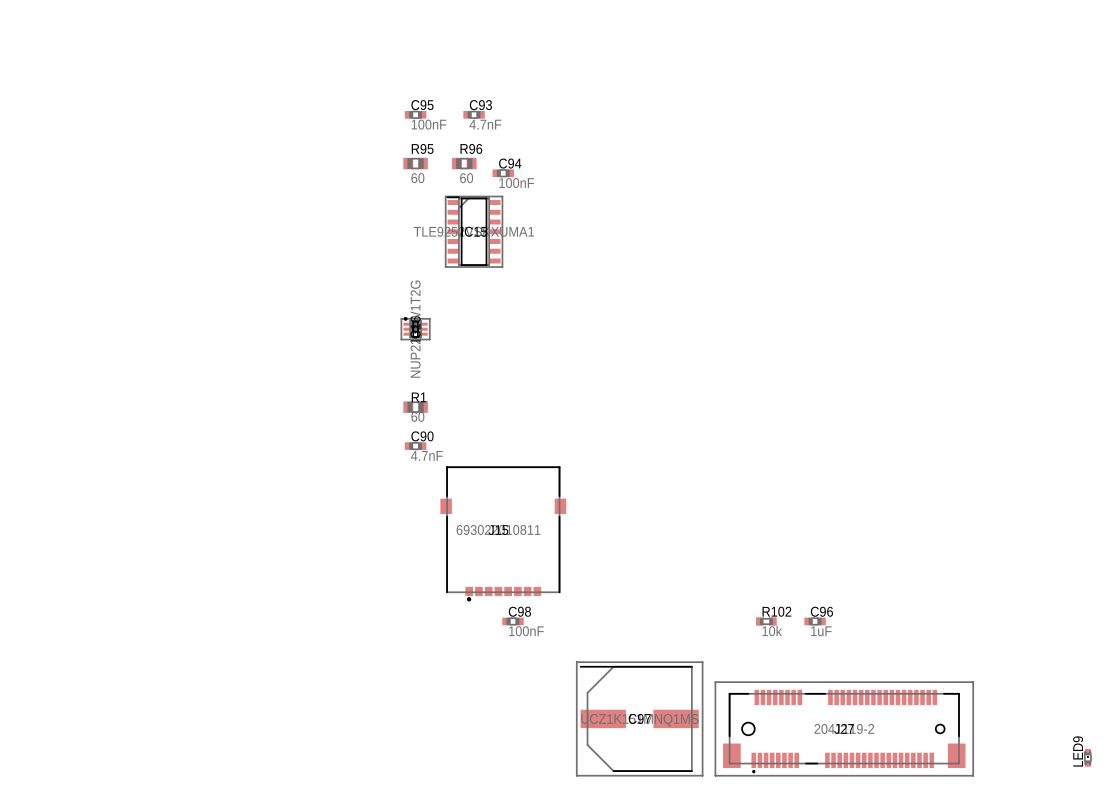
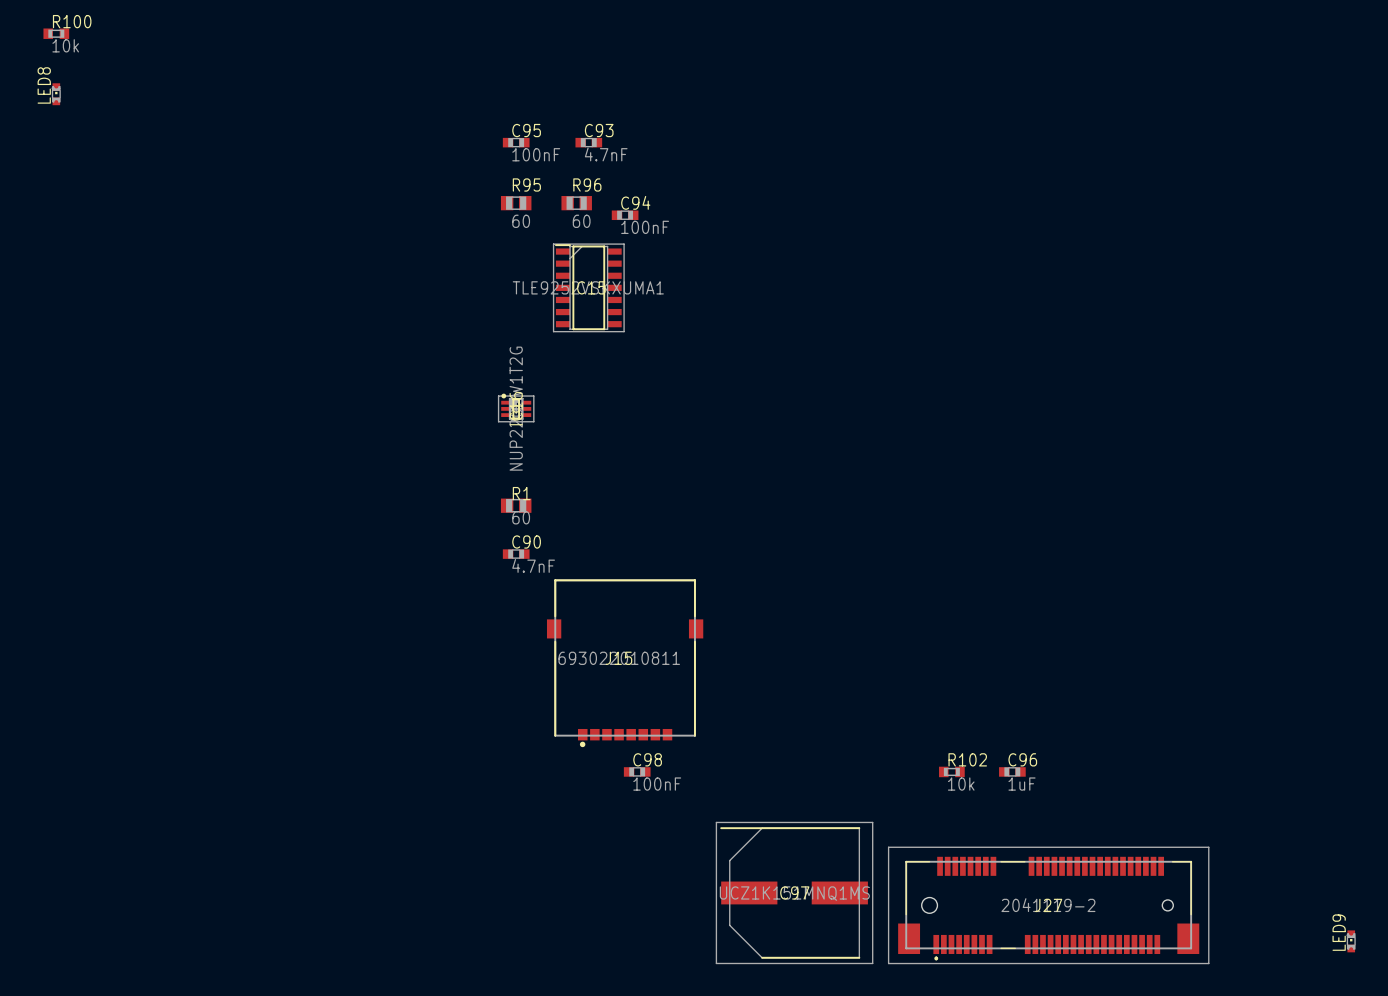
R100: none -> 10k (56, 33)
LED8: none -> (56, 94)

